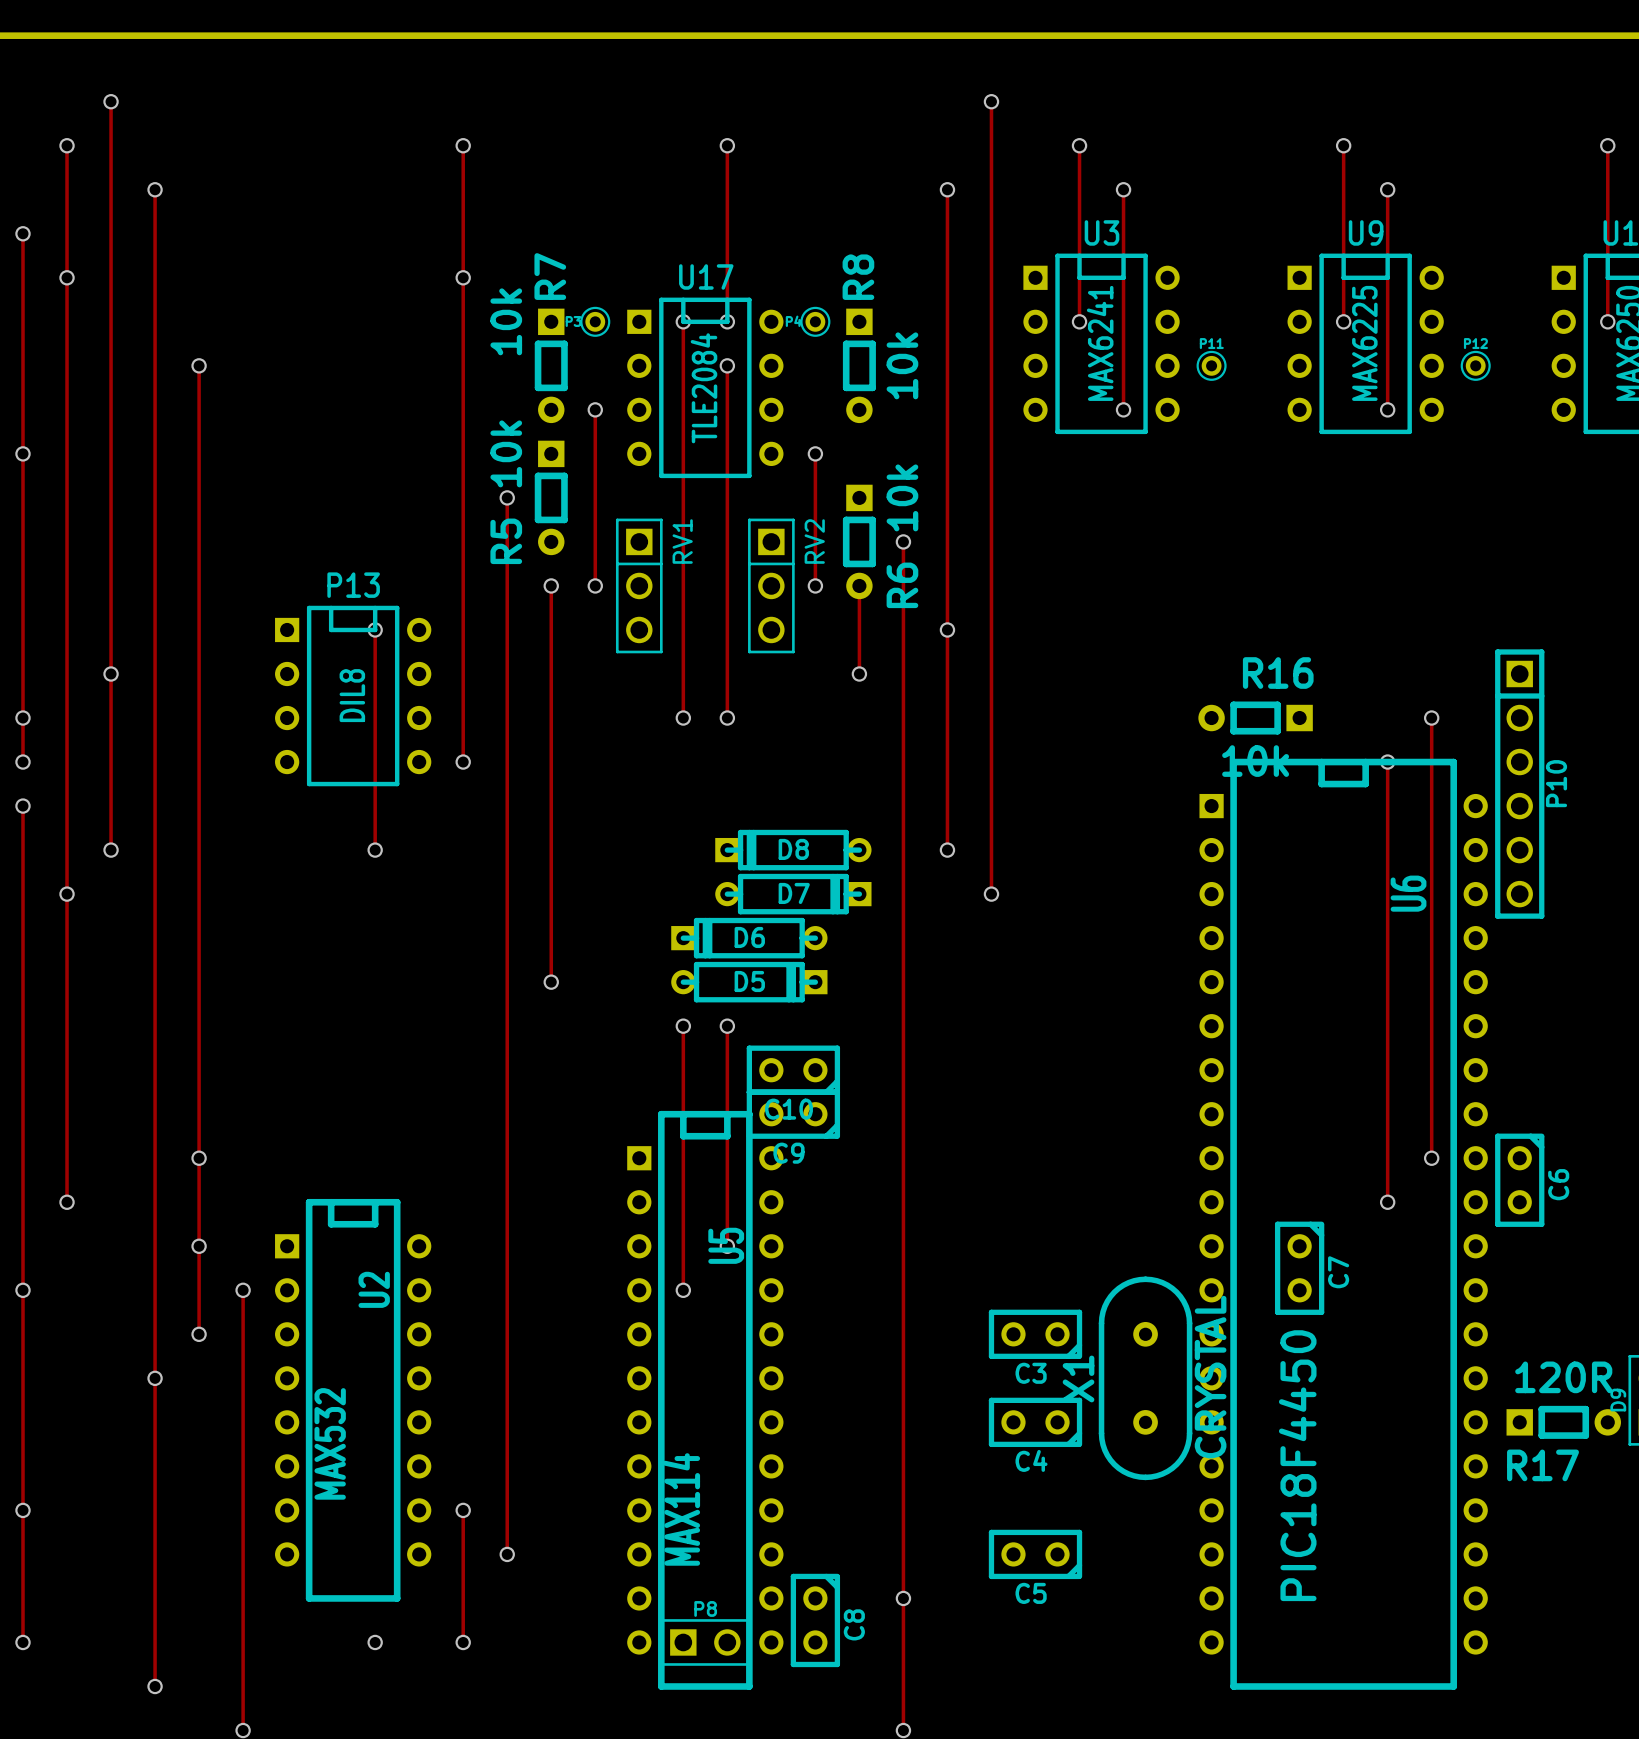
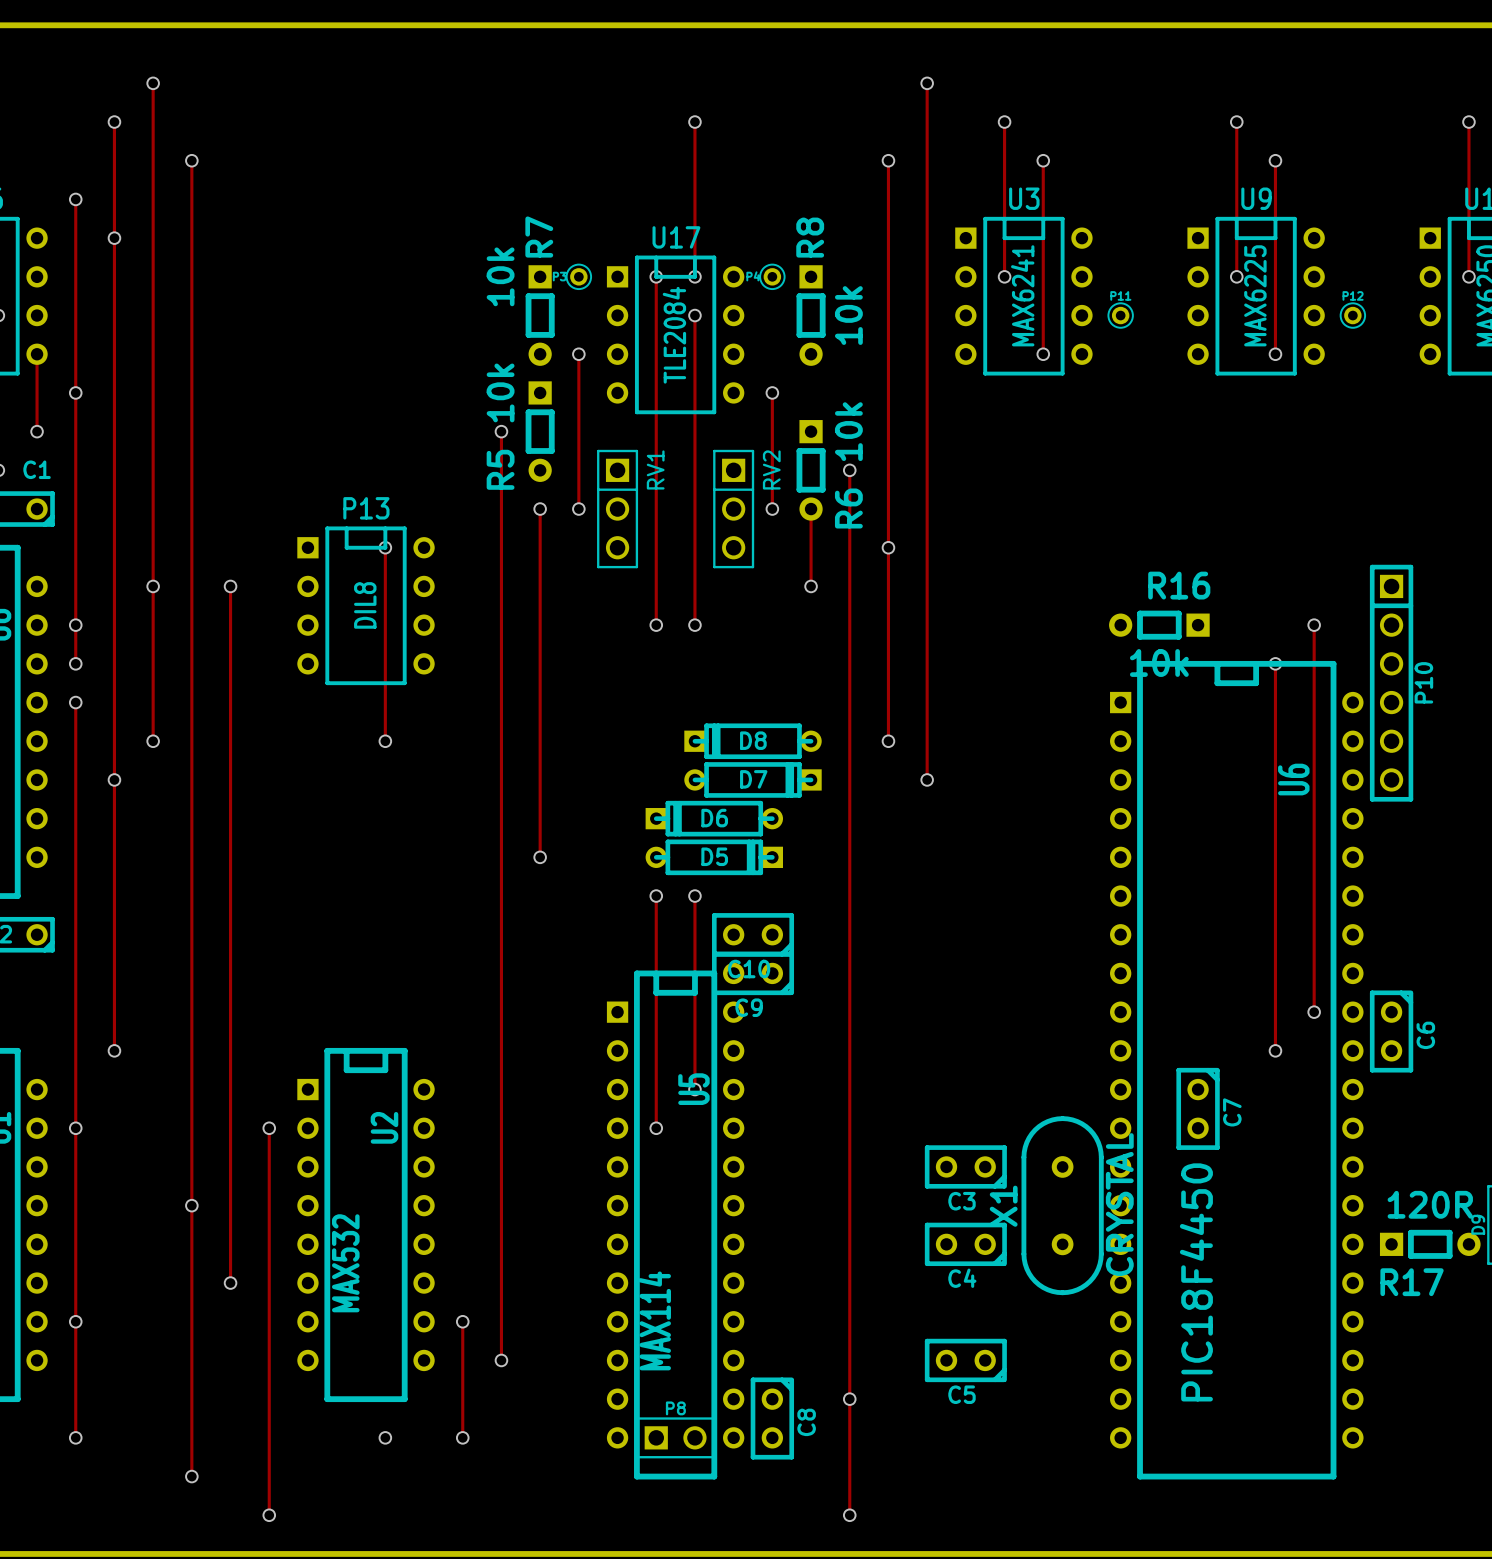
track: (463, 145) (463, 762) -> none
via: (463, 145) -> none
via: (463, 277) -> none
track: (199, 365) (199, 674) -> none
via: (199, 365) -> none
via: none -> (230, 586)
via: (463, 762) -> none
via: (199, 1158) -> none
via: (199, 1246) -> none
track: none -> (230, 1166) (230, 1283)
via: (199, 1334) -> none
via: none -> (230, 1283)

